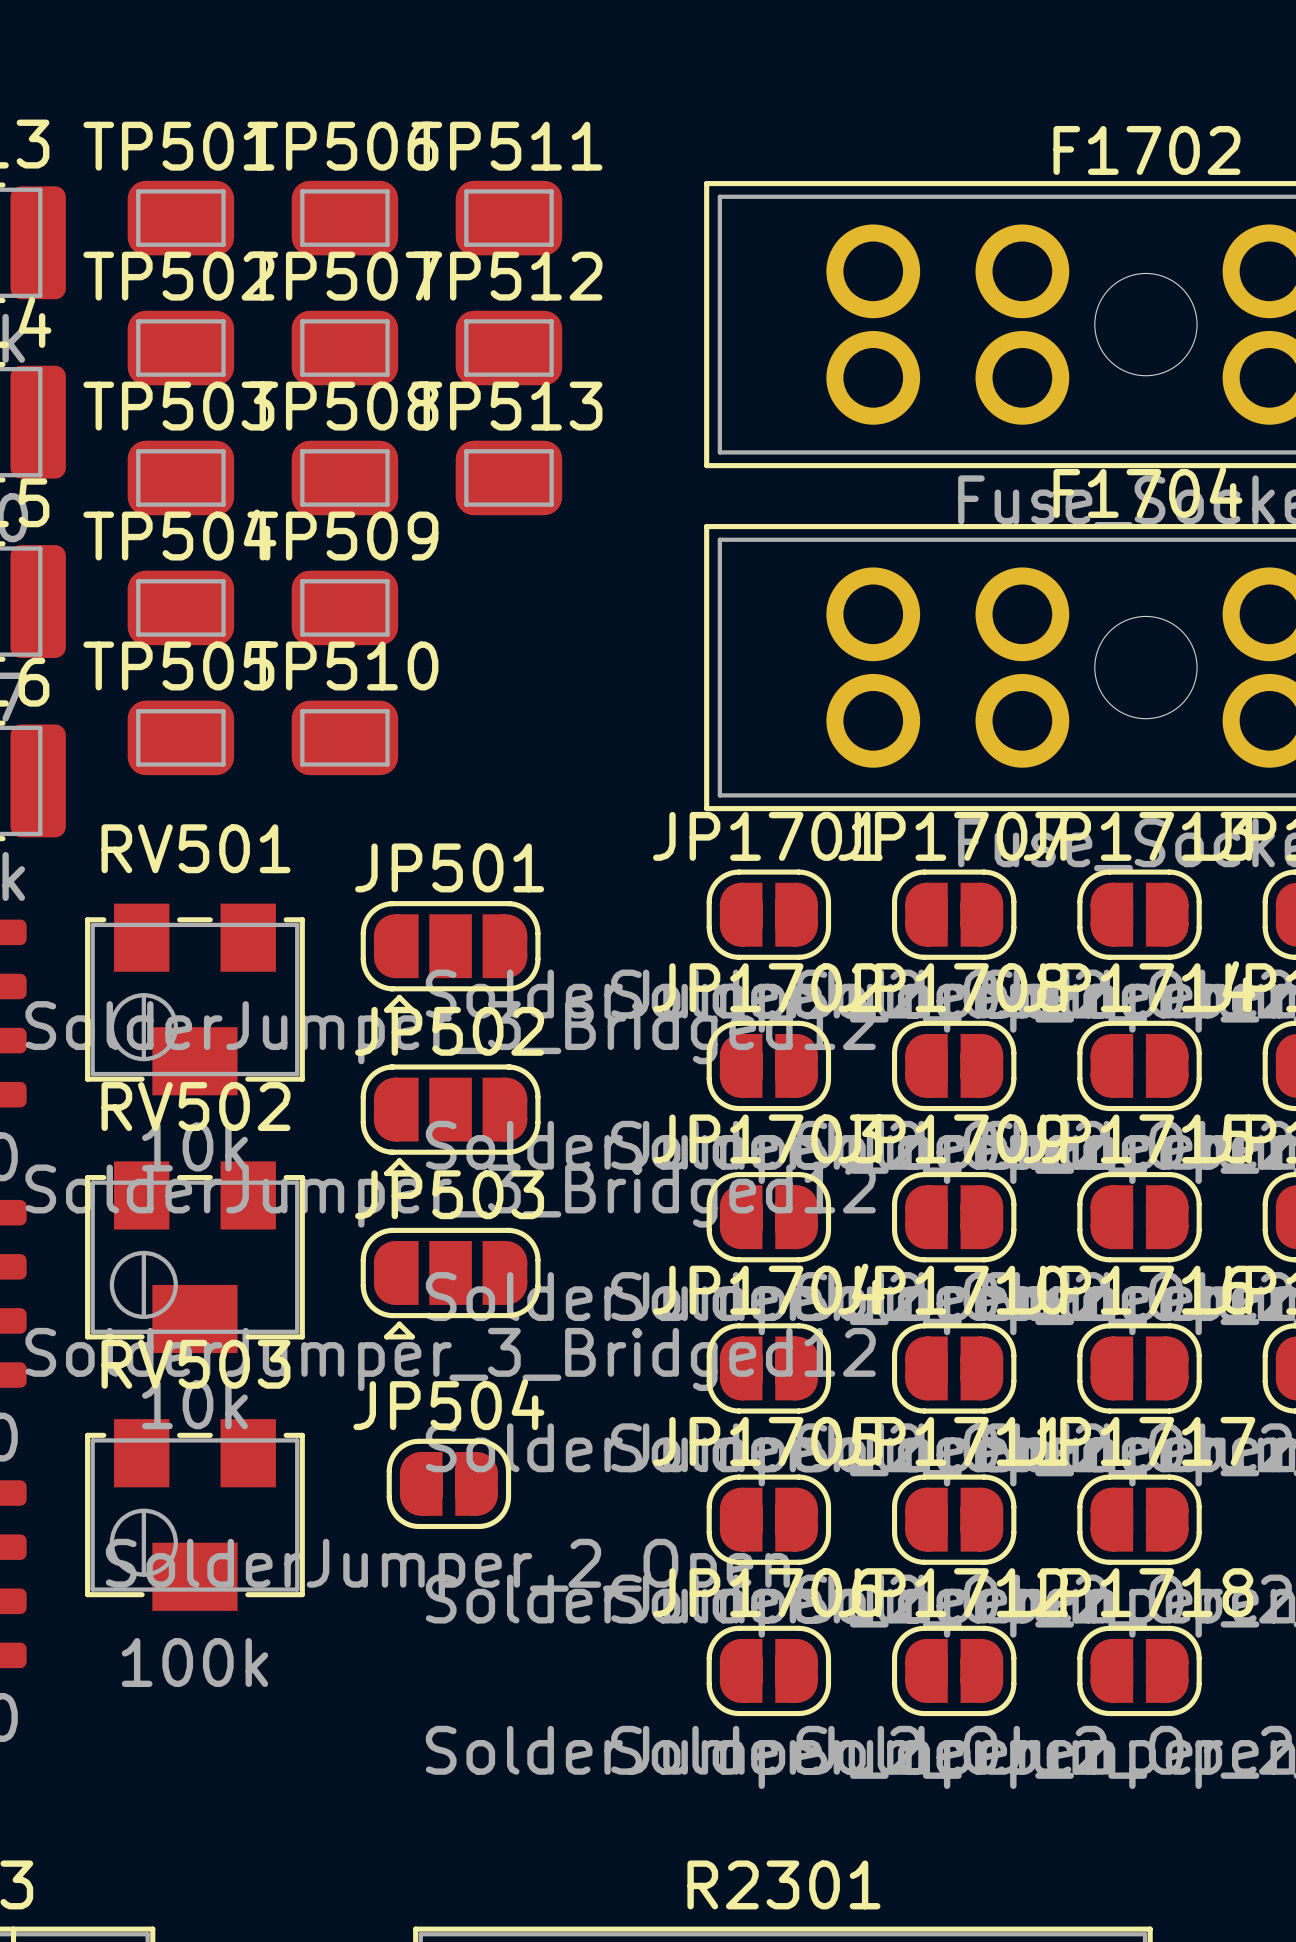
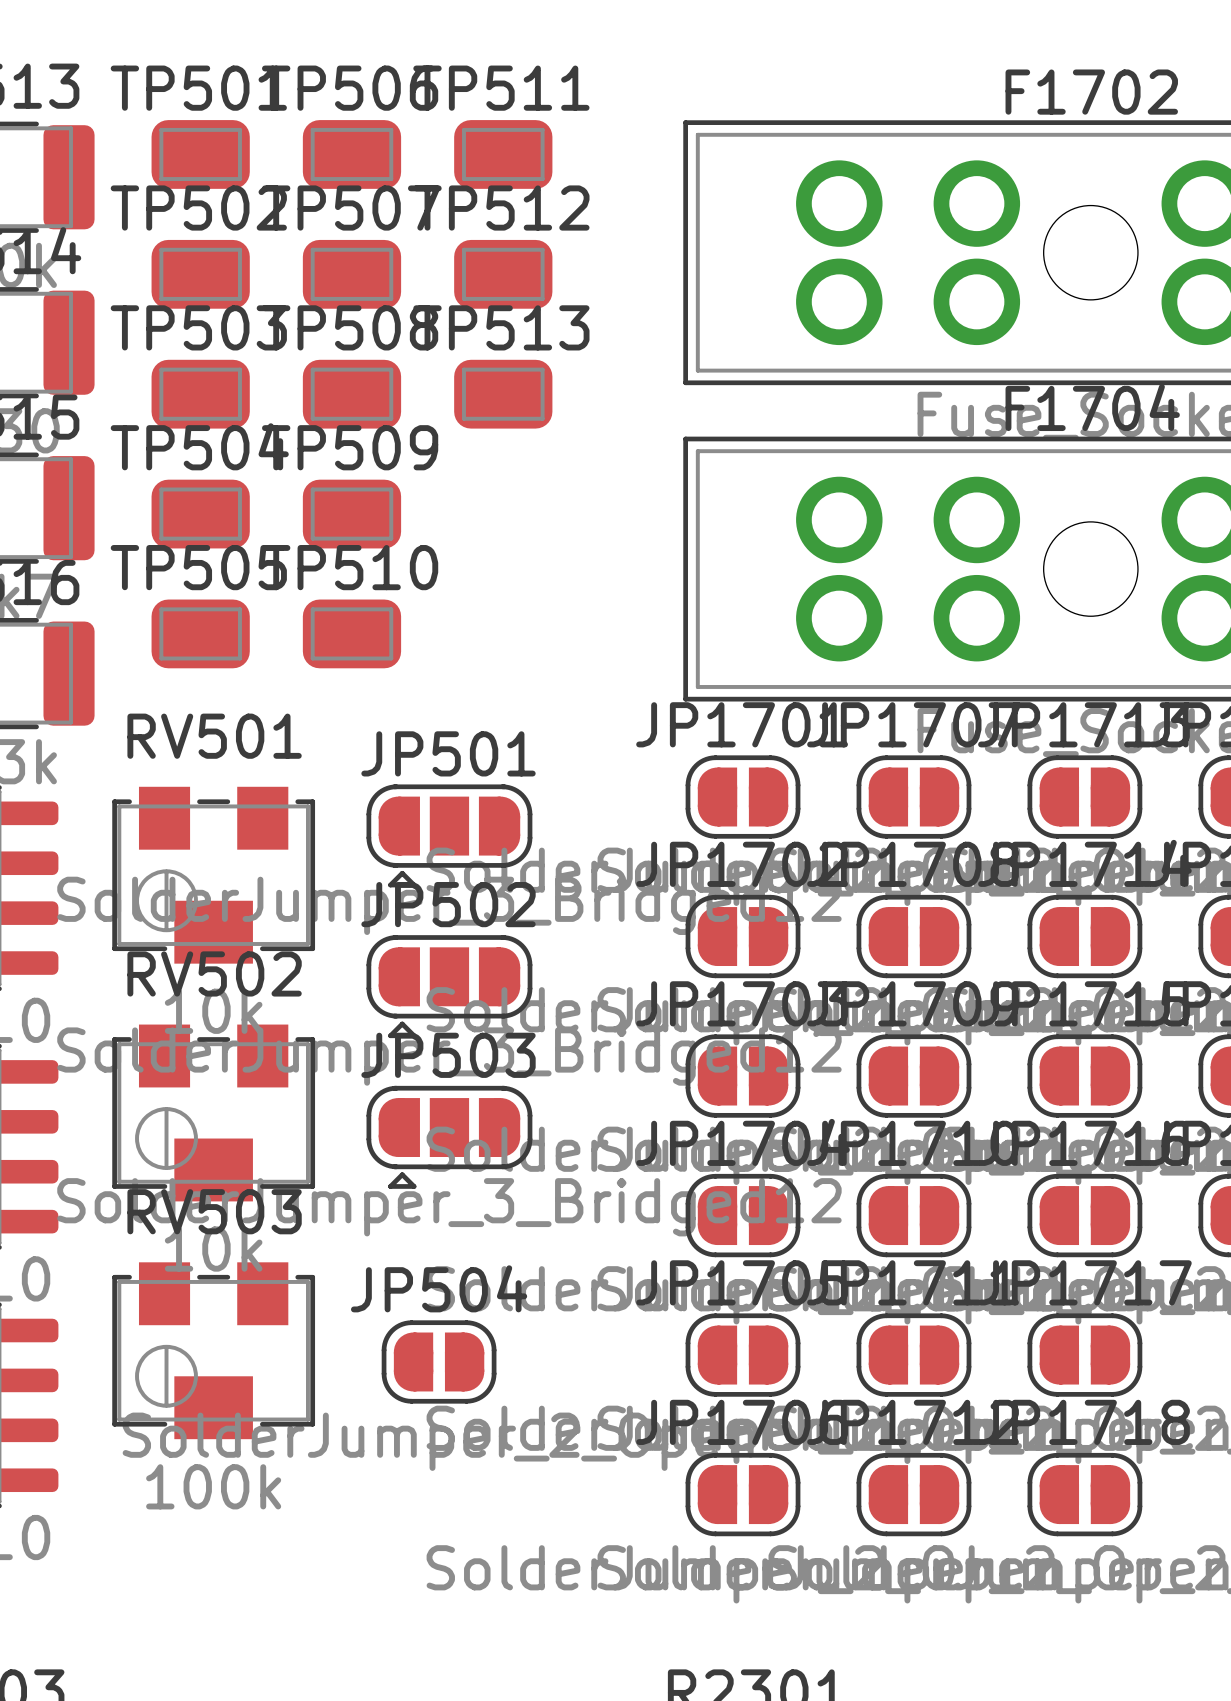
JP504 position: (448, 1483) -> (439, 1361)

